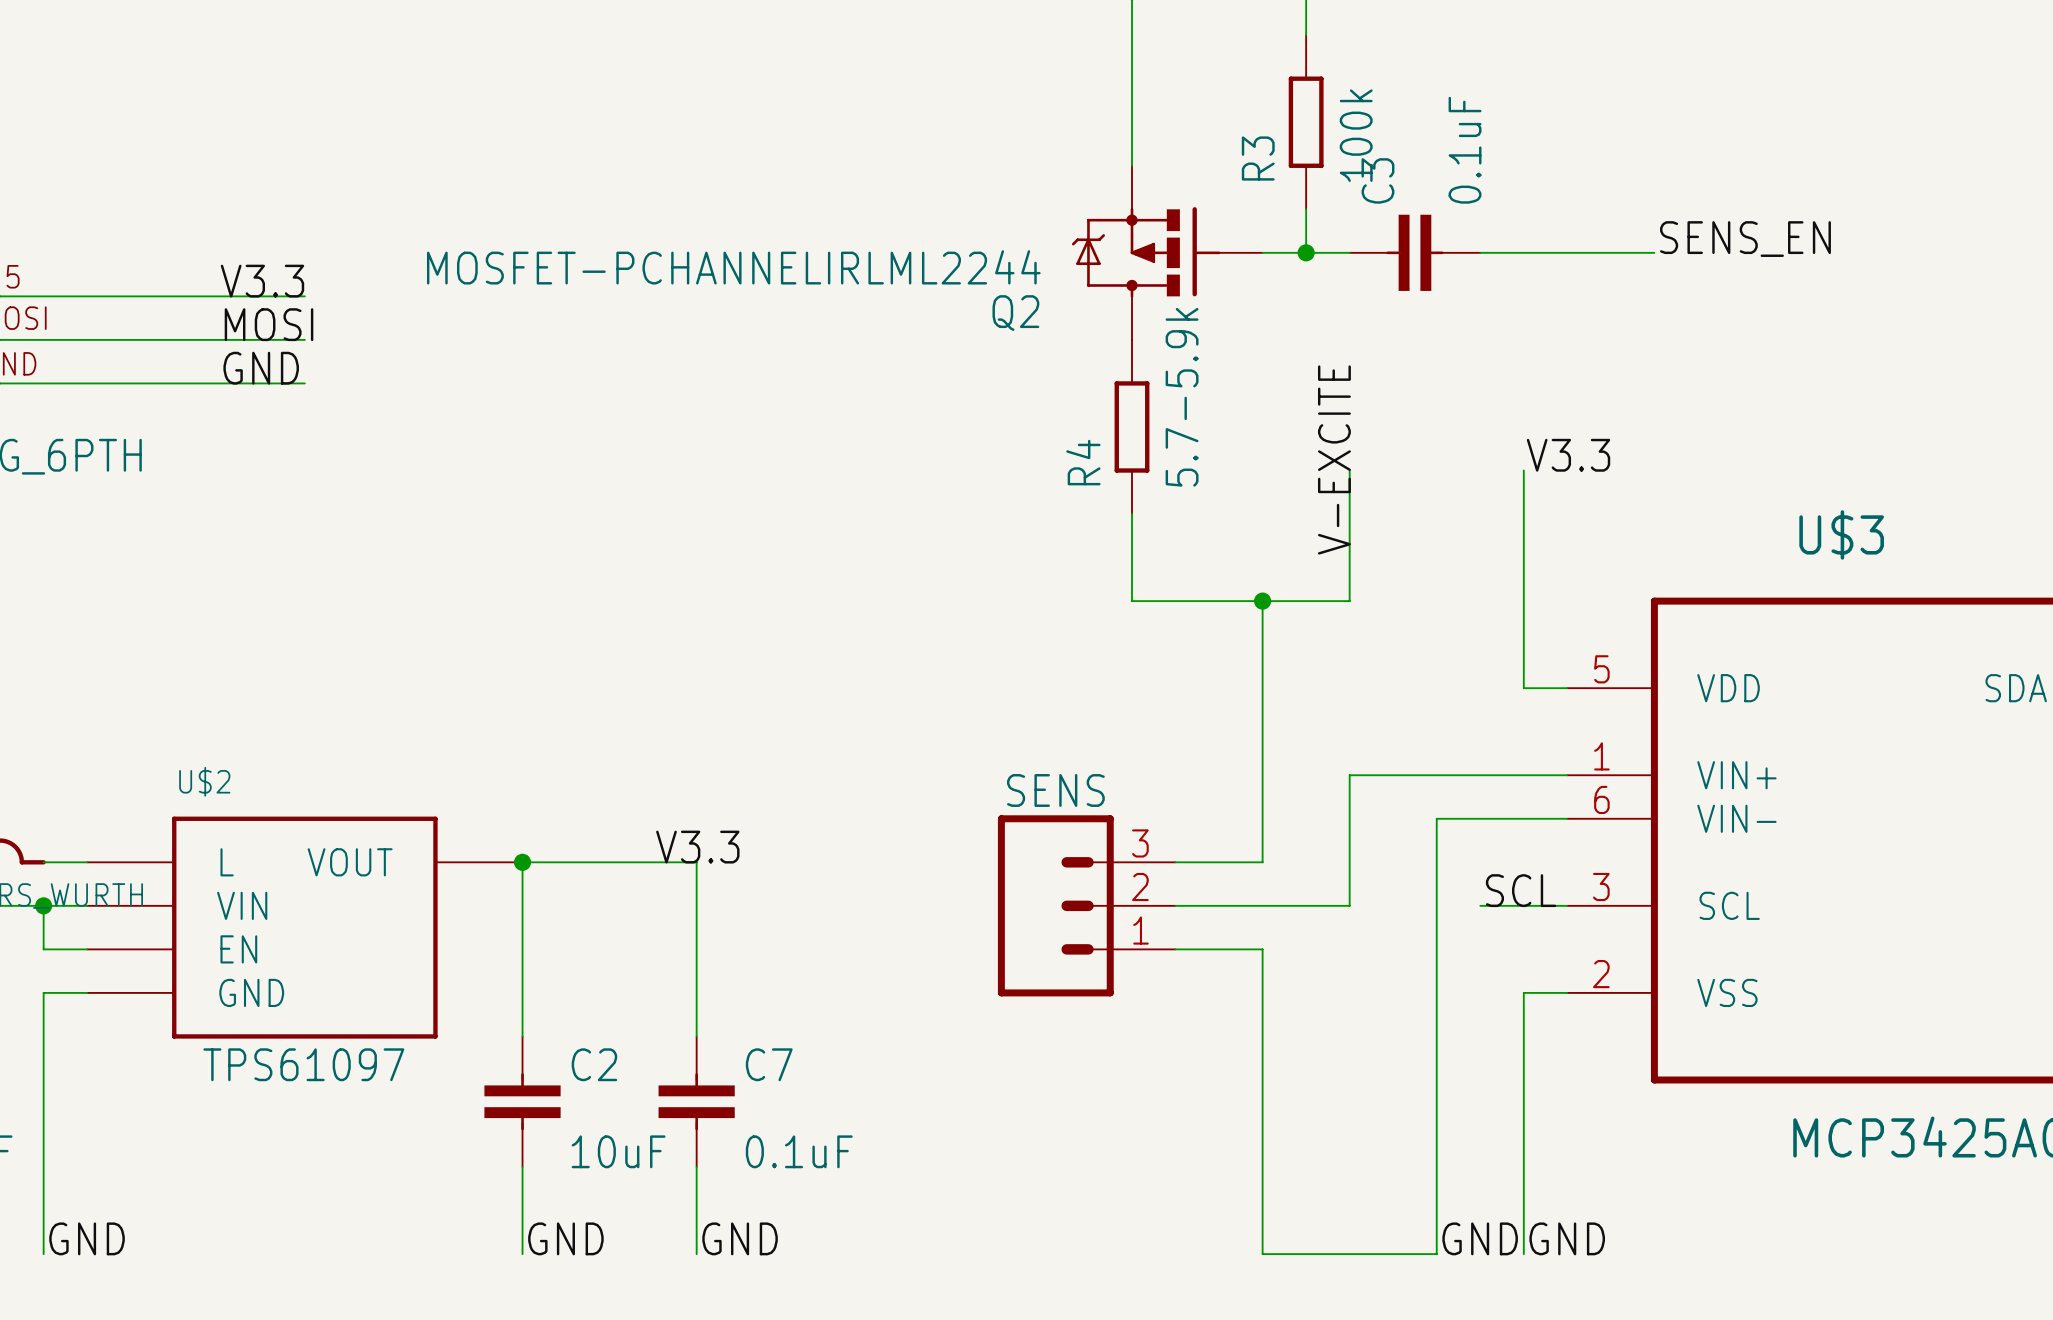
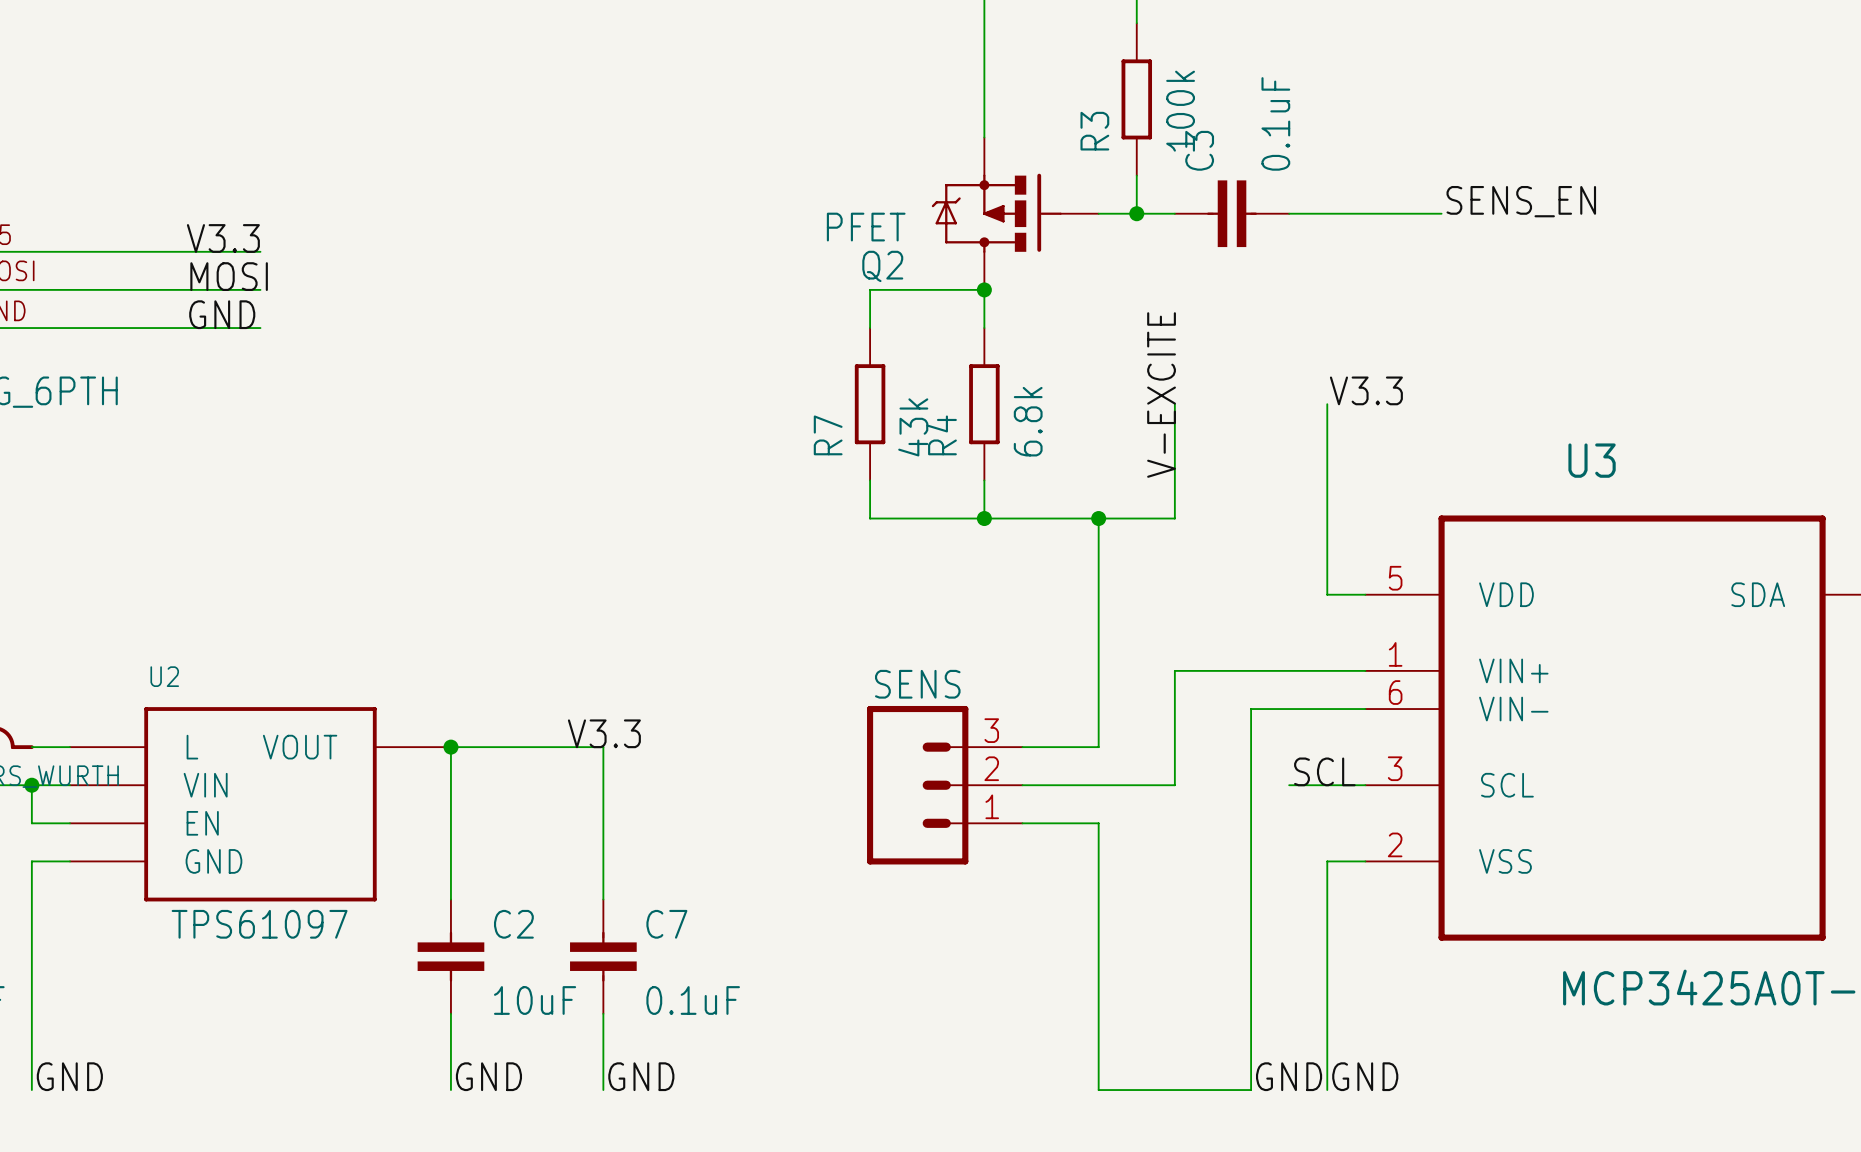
Q2 value: MOSFET-PCHANNELIRLML2244 (733, 267) -> PFET (866, 227)
junction: none -> (984, 289)
wire: none -> (870, 328) (870, 289) (984, 289) (984, 328)
R4 value: 5.7-5.9k (1182, 397) -> 6.8k (1028, 421)
R4 position: (1132, 426) -> (984, 404)
R7: none -> 43k (870, 404)
U$3 name: U$3 (1841, 534) -> U3 (1592, 460)
wire: none -> (870, 480) (870, 518) (984, 518)
junction: none -> (984, 518)
U$2 name: U$2 (204, 781) -> U2 (164, 676)

